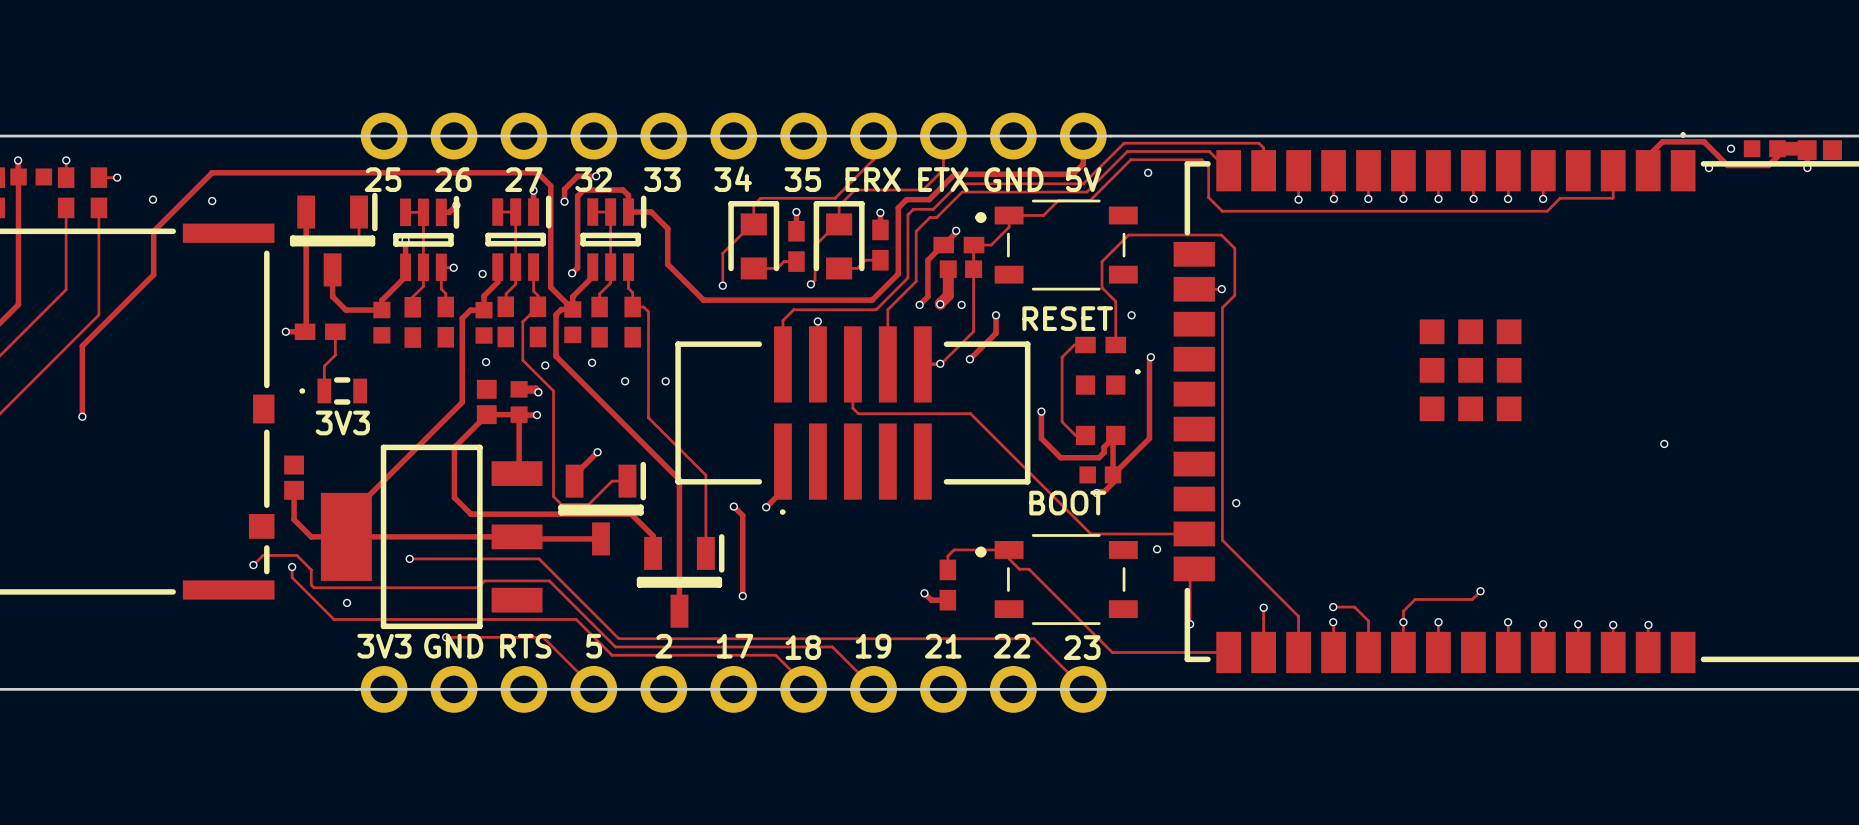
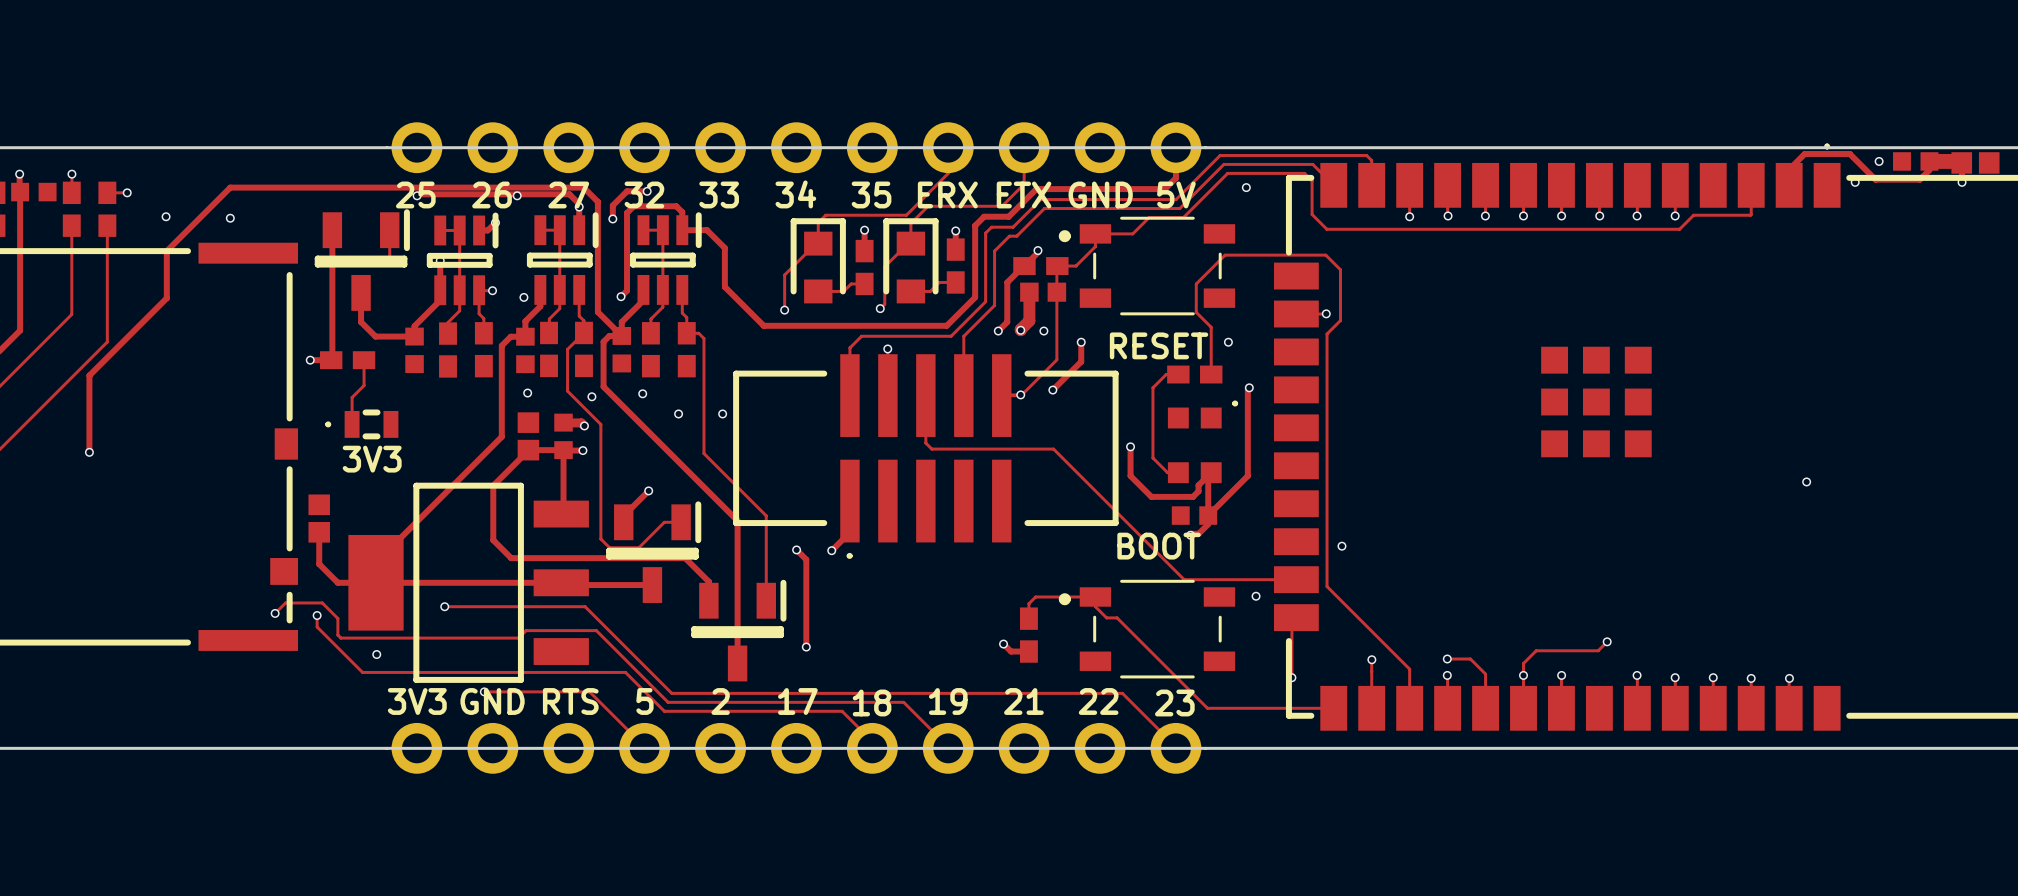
track: none -> (417, 195) (569, 194) (579, 204) (579, 207)
via: none -> (417, 195)
via: none -> (517, 195)

